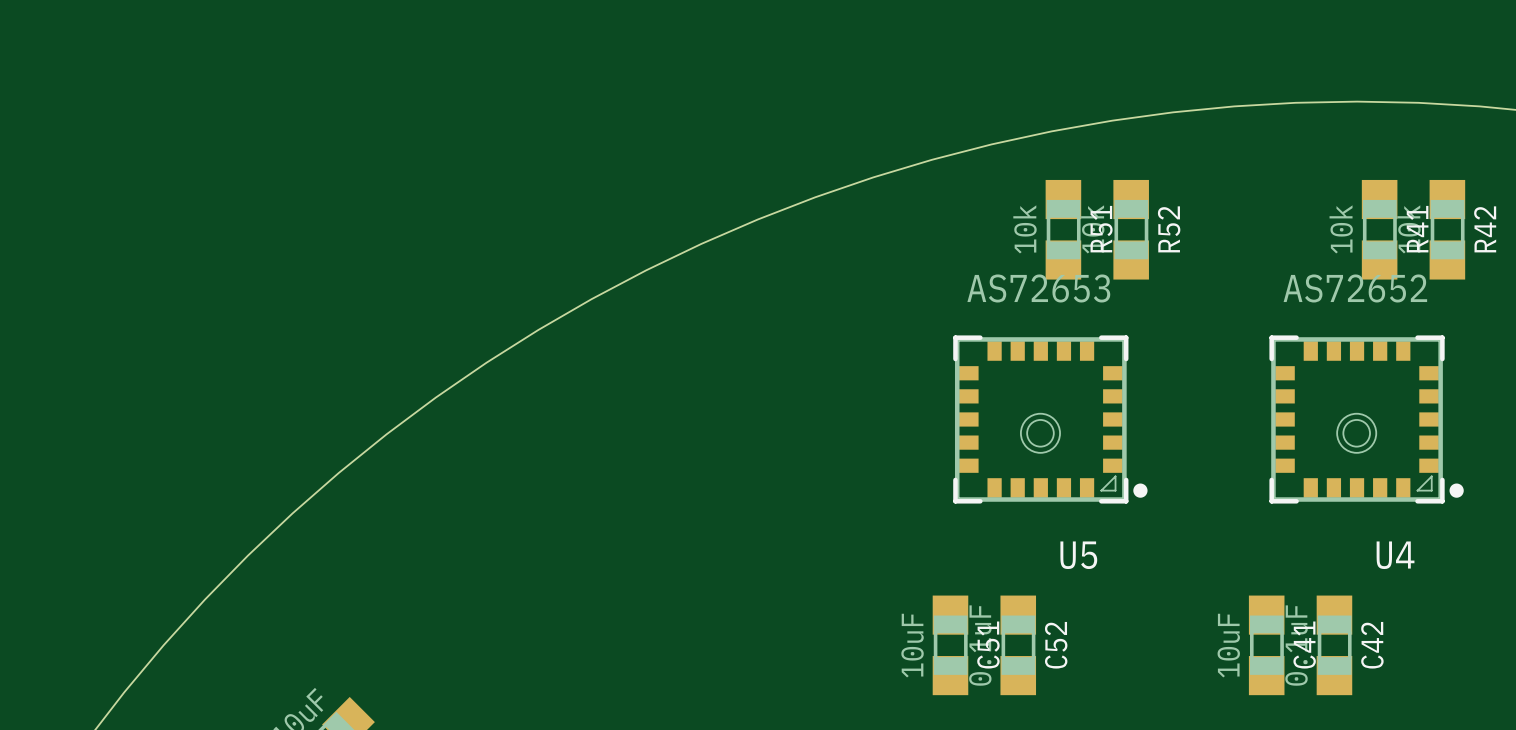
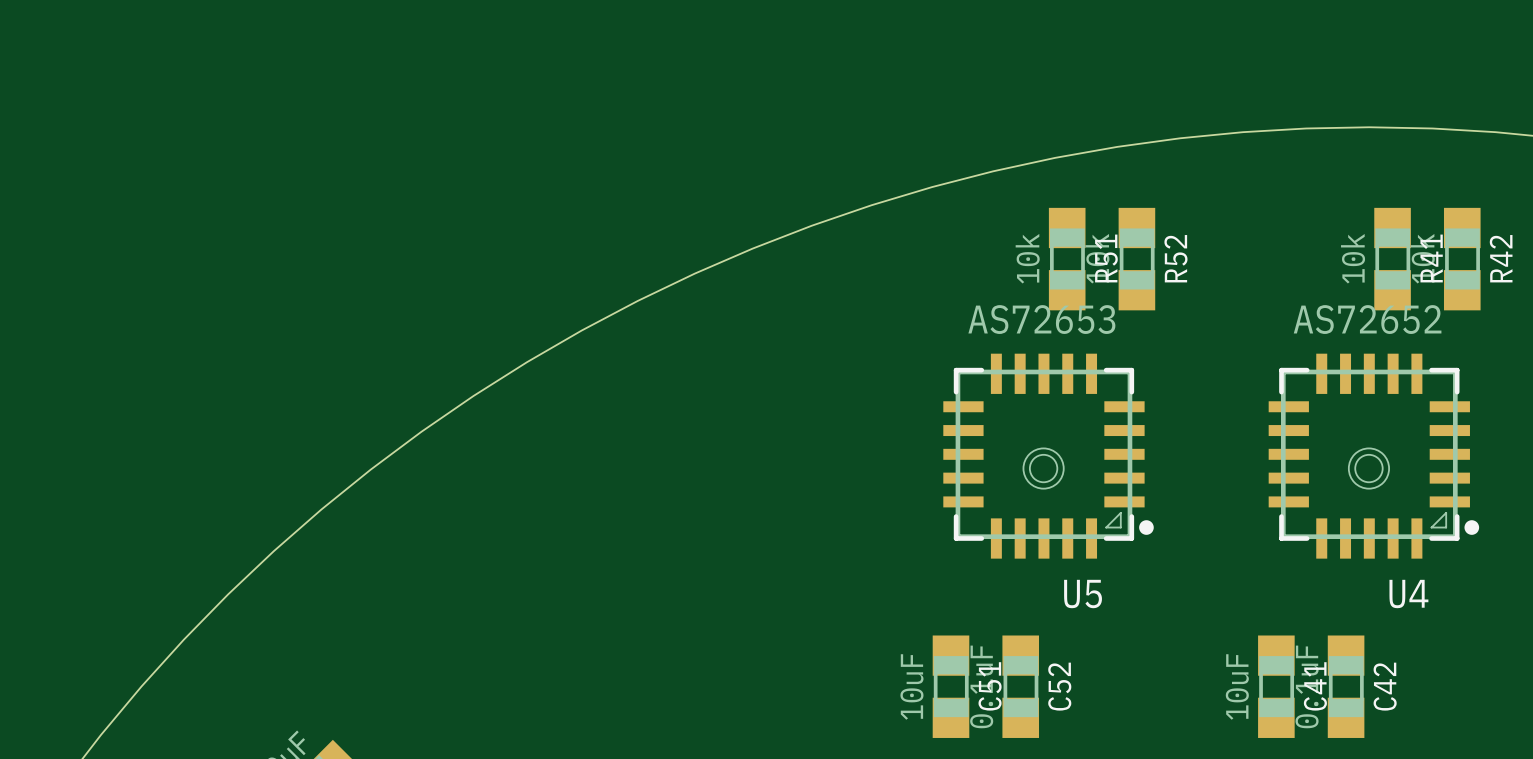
U5 footprint: [953, 335, 1148, 504] -> [943, 353, 1154, 559]
U4 footprint: [1269, 335, 1464, 504] -> [1268, 353, 1480, 559]

